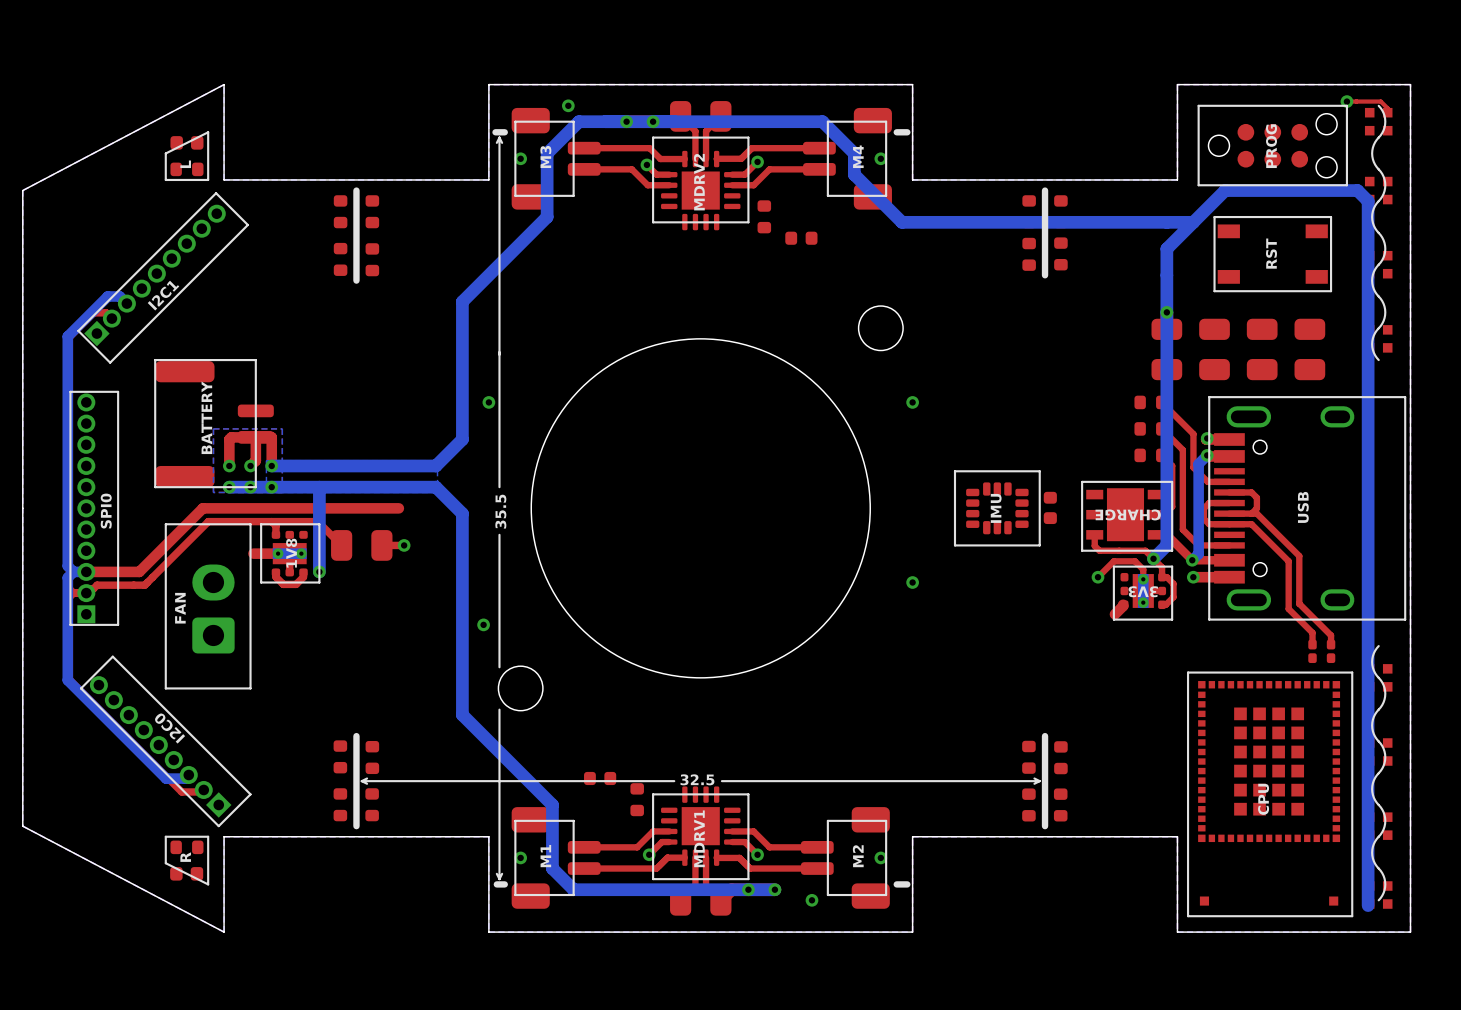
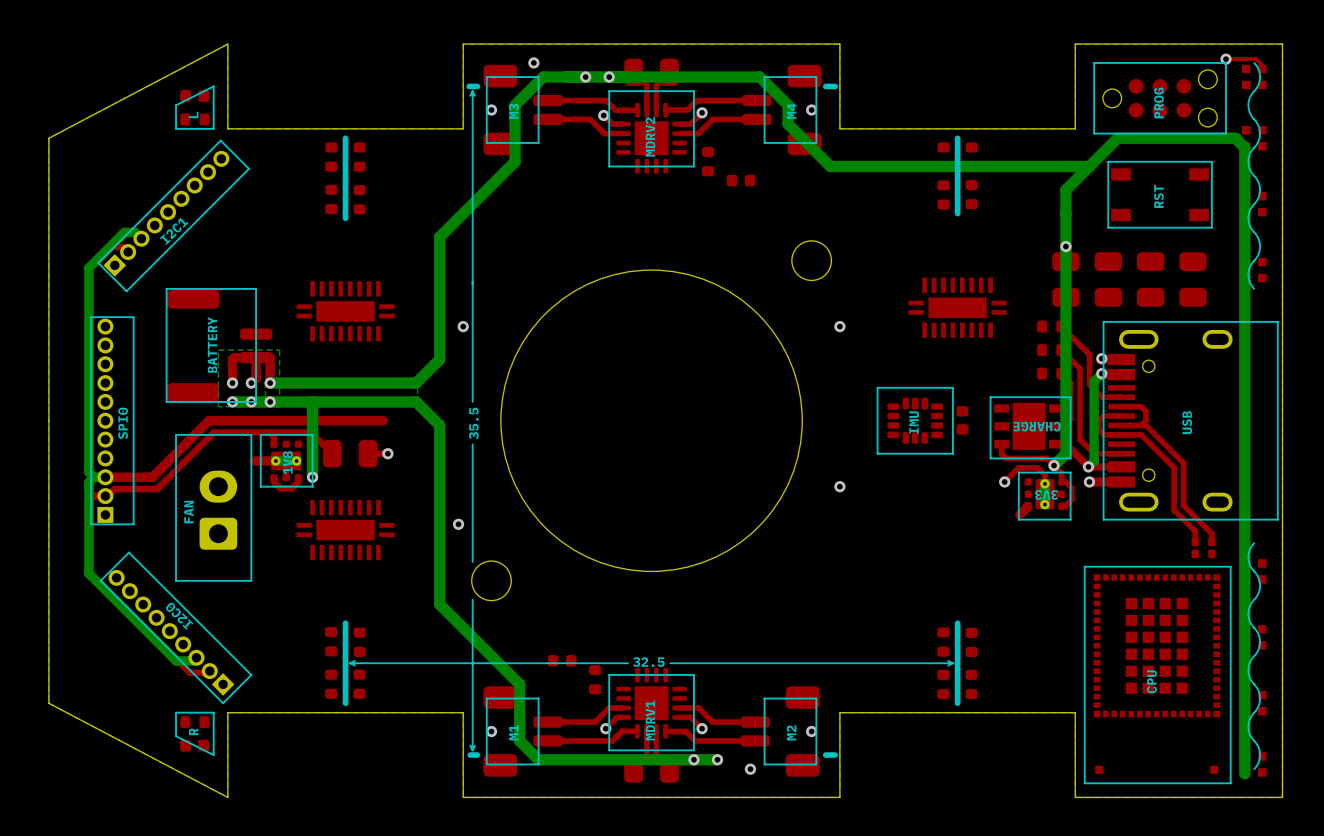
part: none -> (957, 307)
part: none -> (345, 311)
part: none -> (345, 530)

